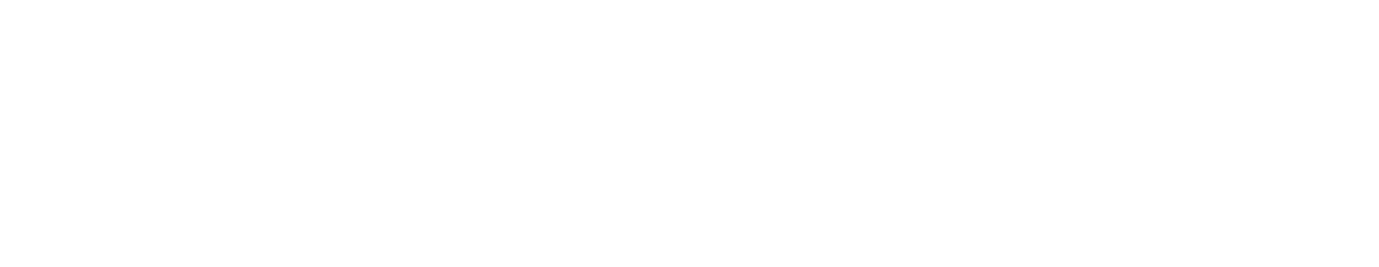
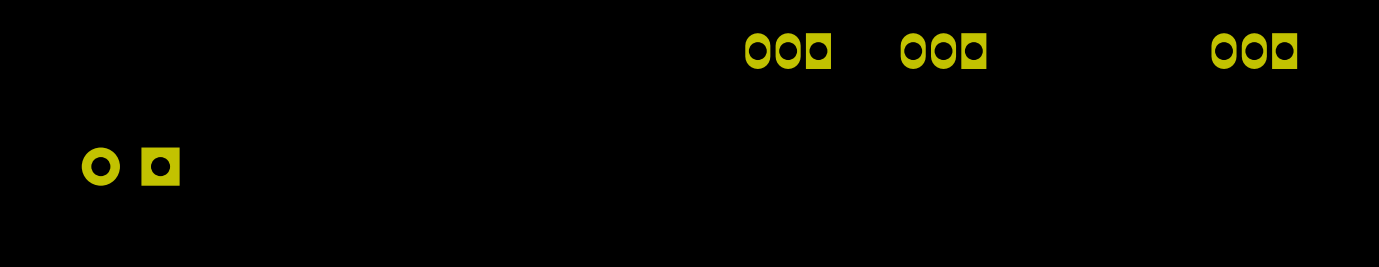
part: none -> (788, 51)
part: none -> (943, 51)
part: none -> (1254, 51)
part: none -> (130, 166)

